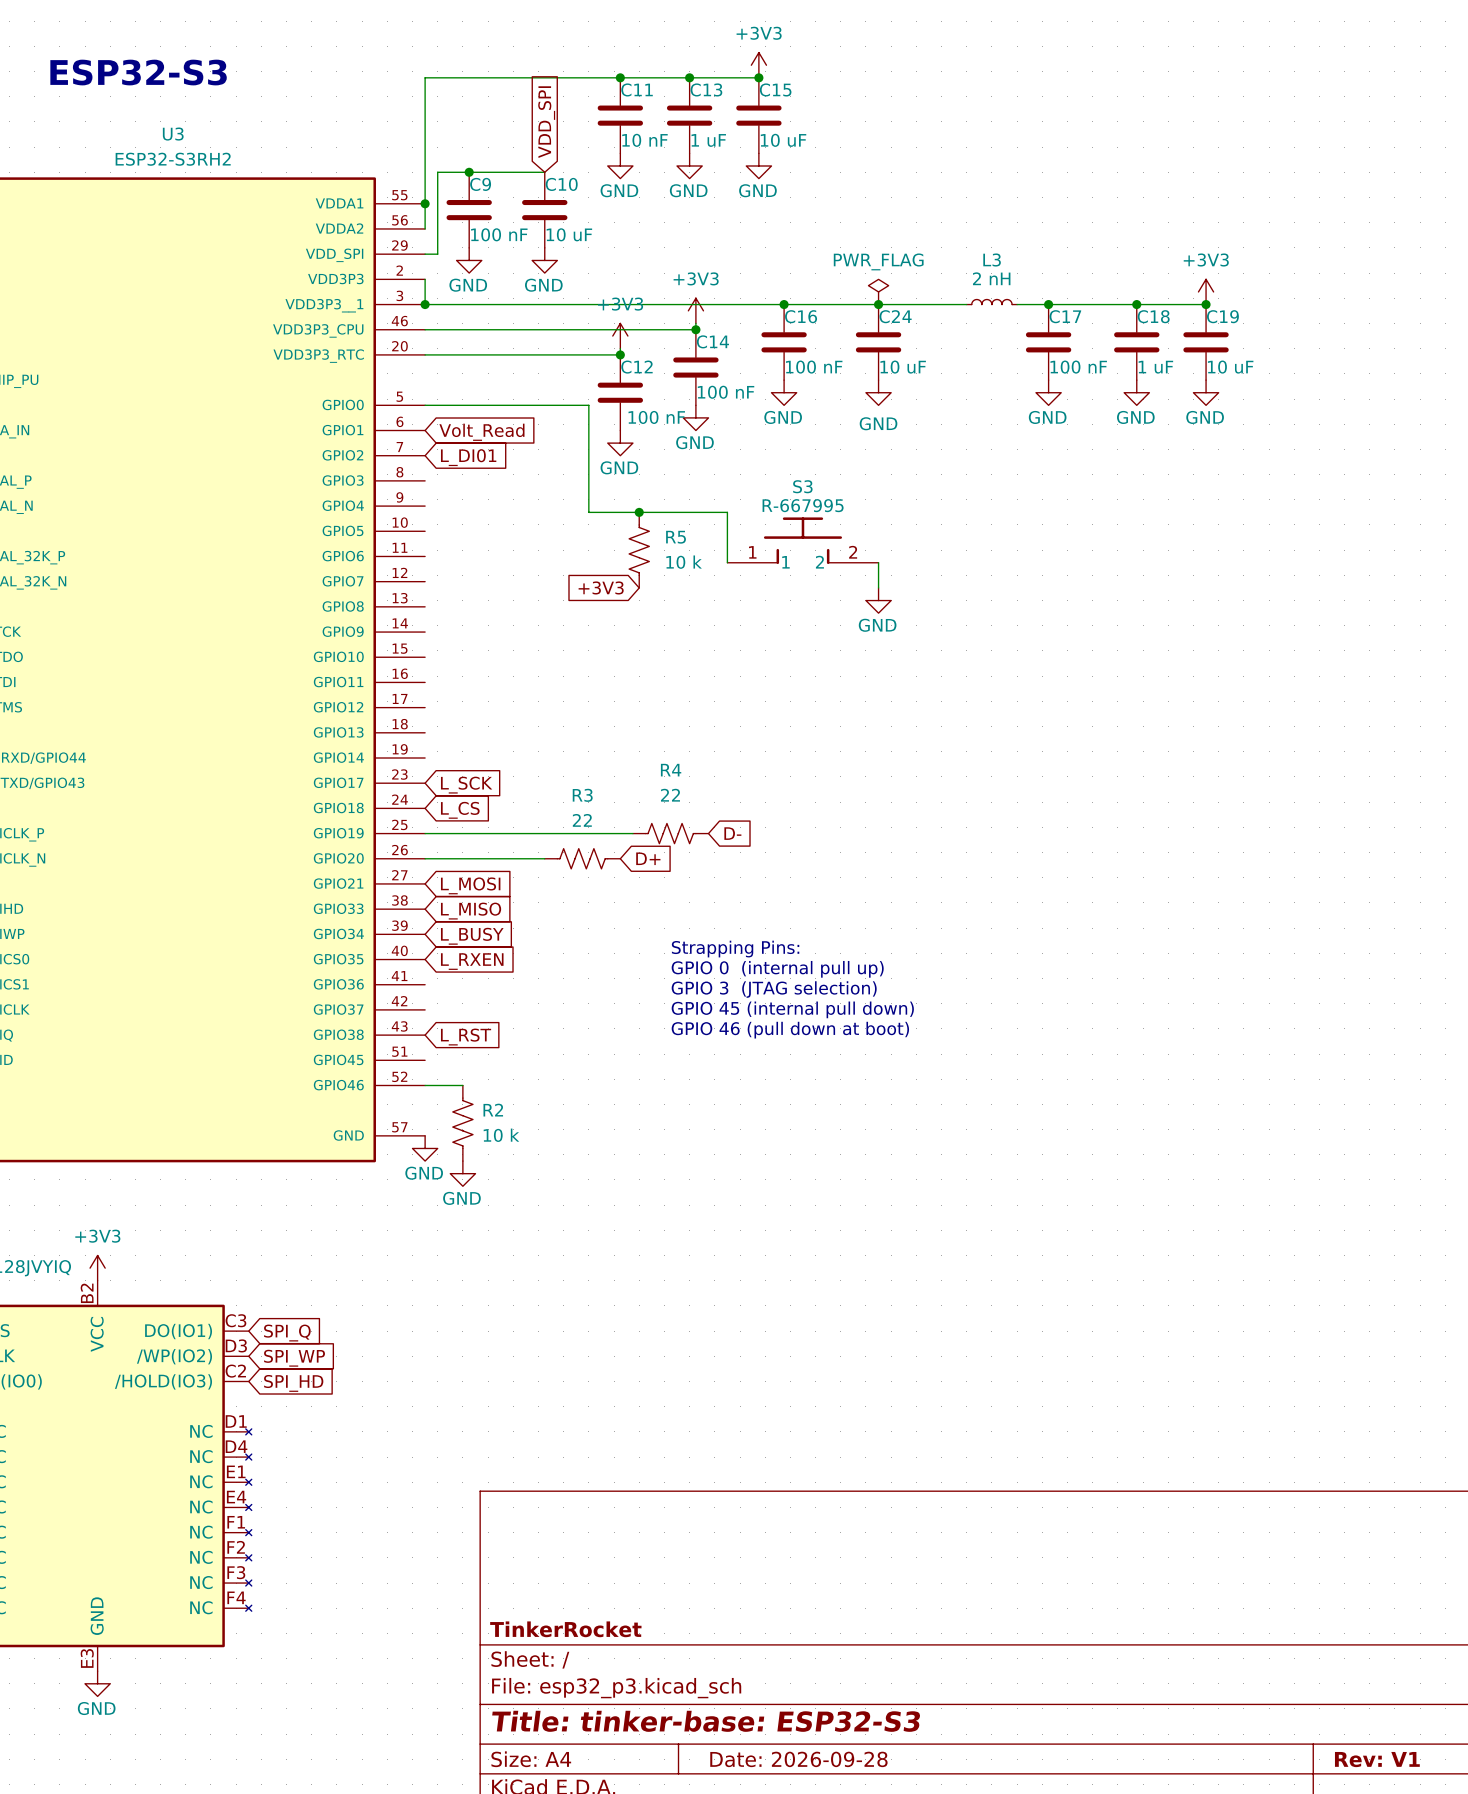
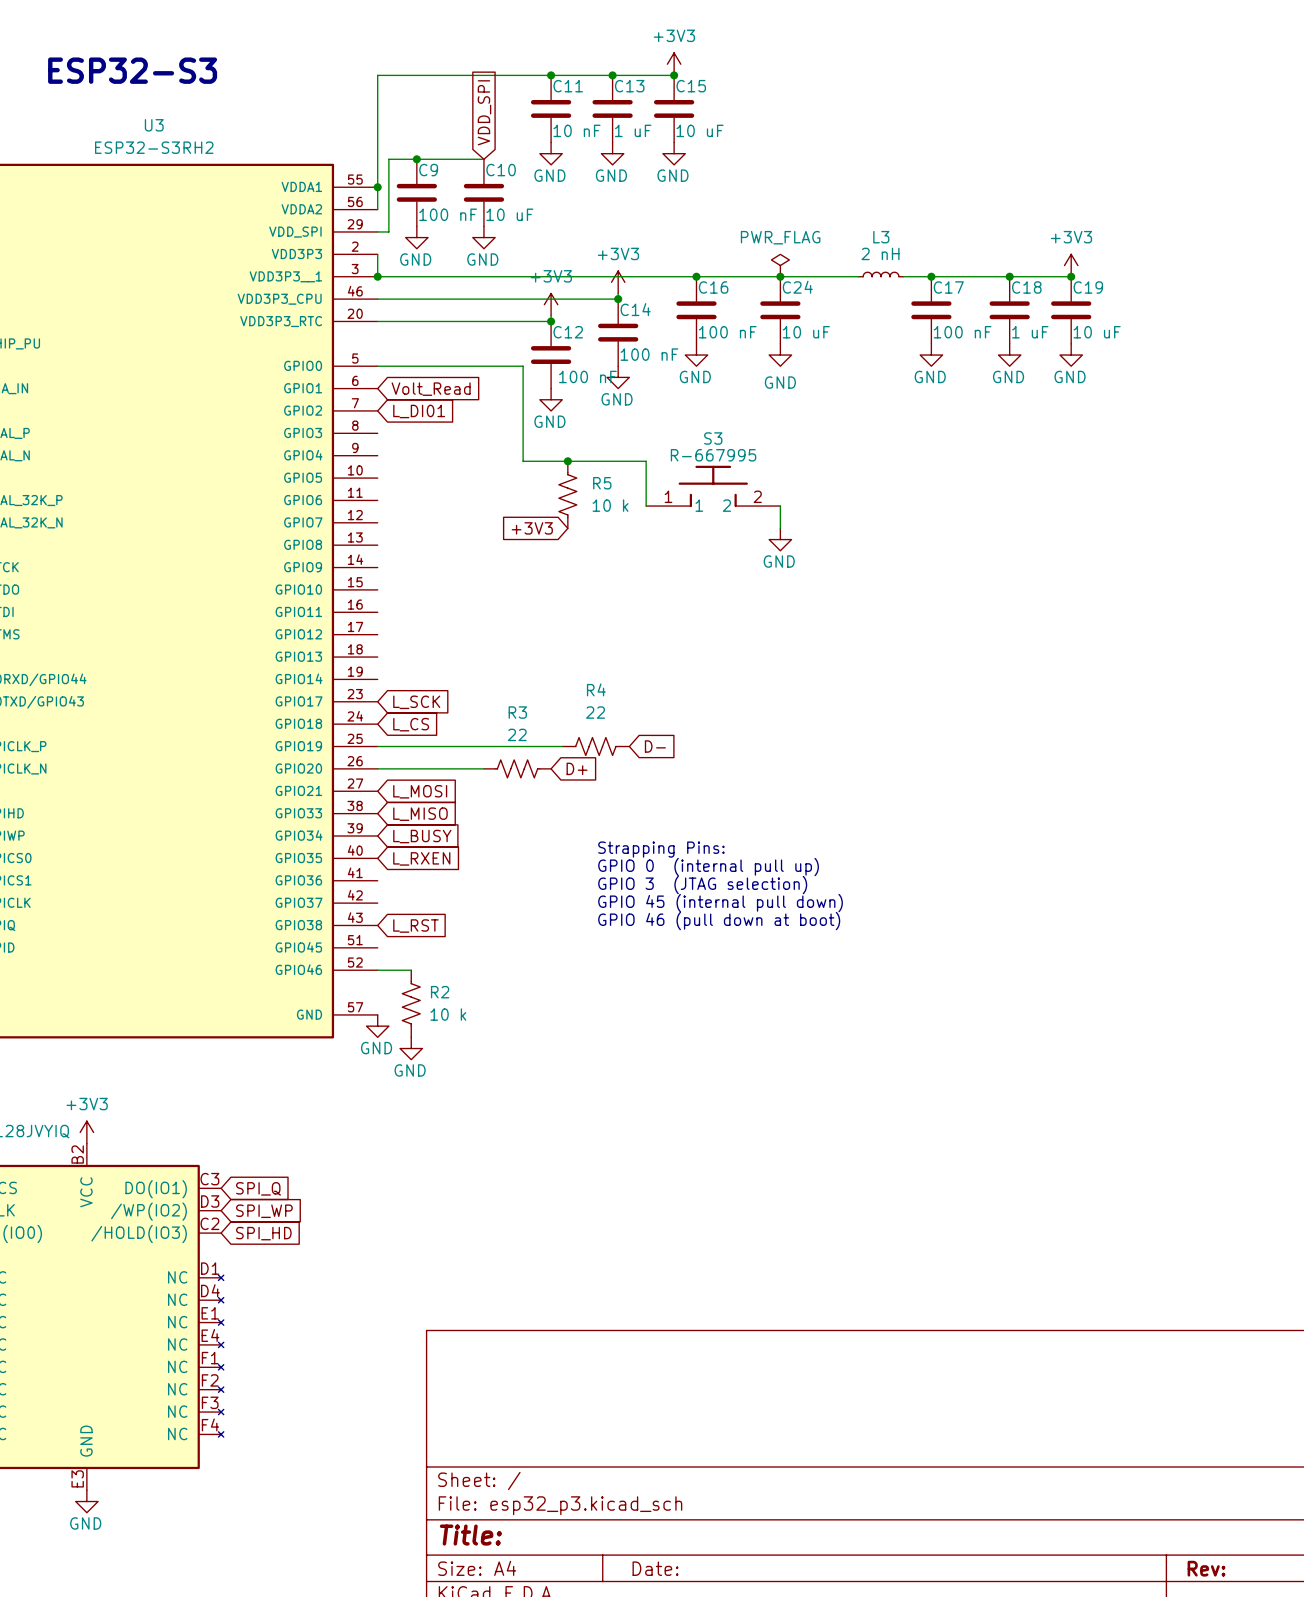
title block: TinkerRocket (565, 1629) -> none
title block: Title: tinker-base: ESP32-S3 (706, 1721) -> Title: (470, 1535)
title block: Date: 2026-09-28 (798, 1759) -> Date: (655, 1568)
title block: Rev: V1 (1377, 1759) -> Rev: (1206, 1568)

